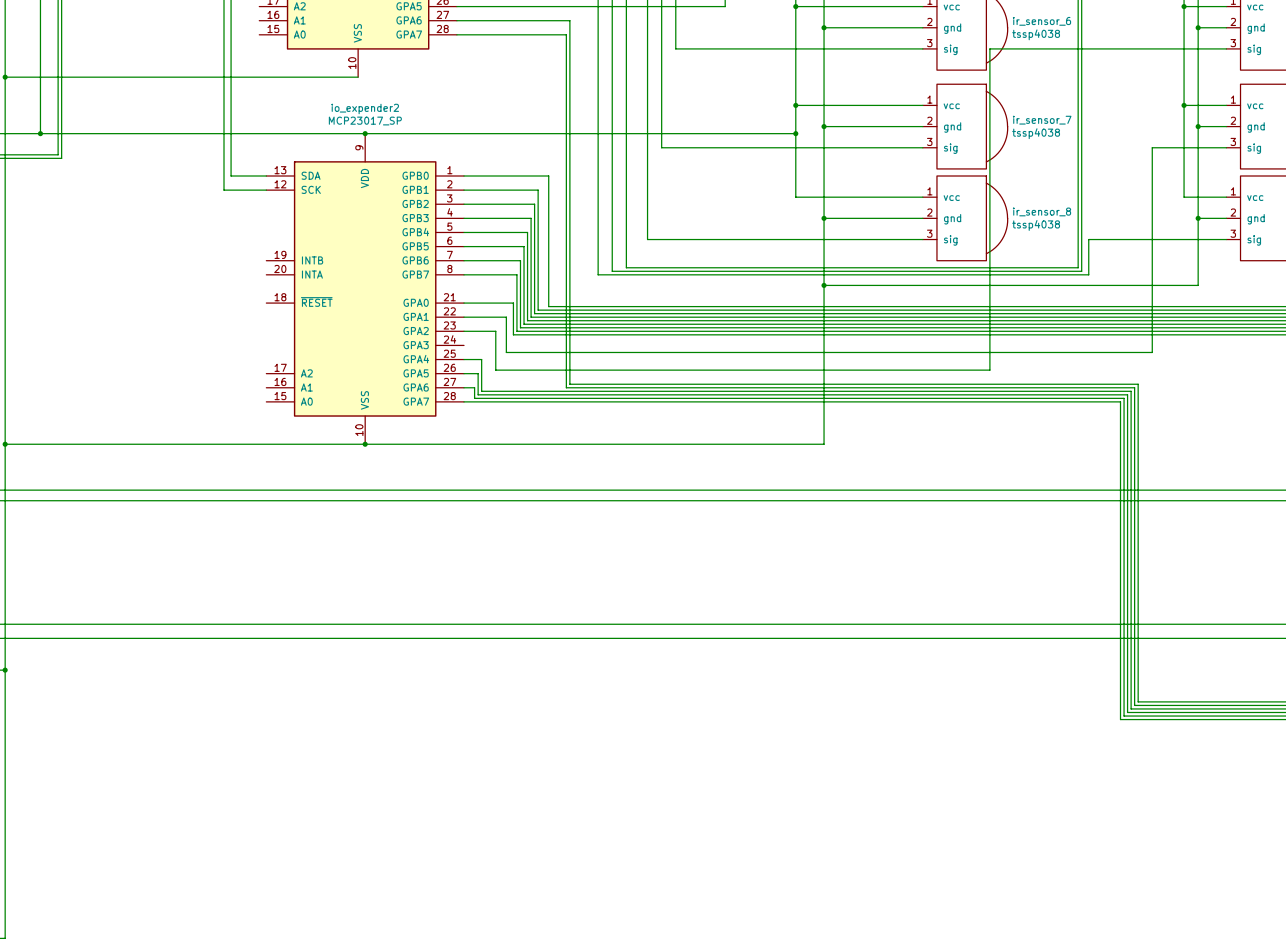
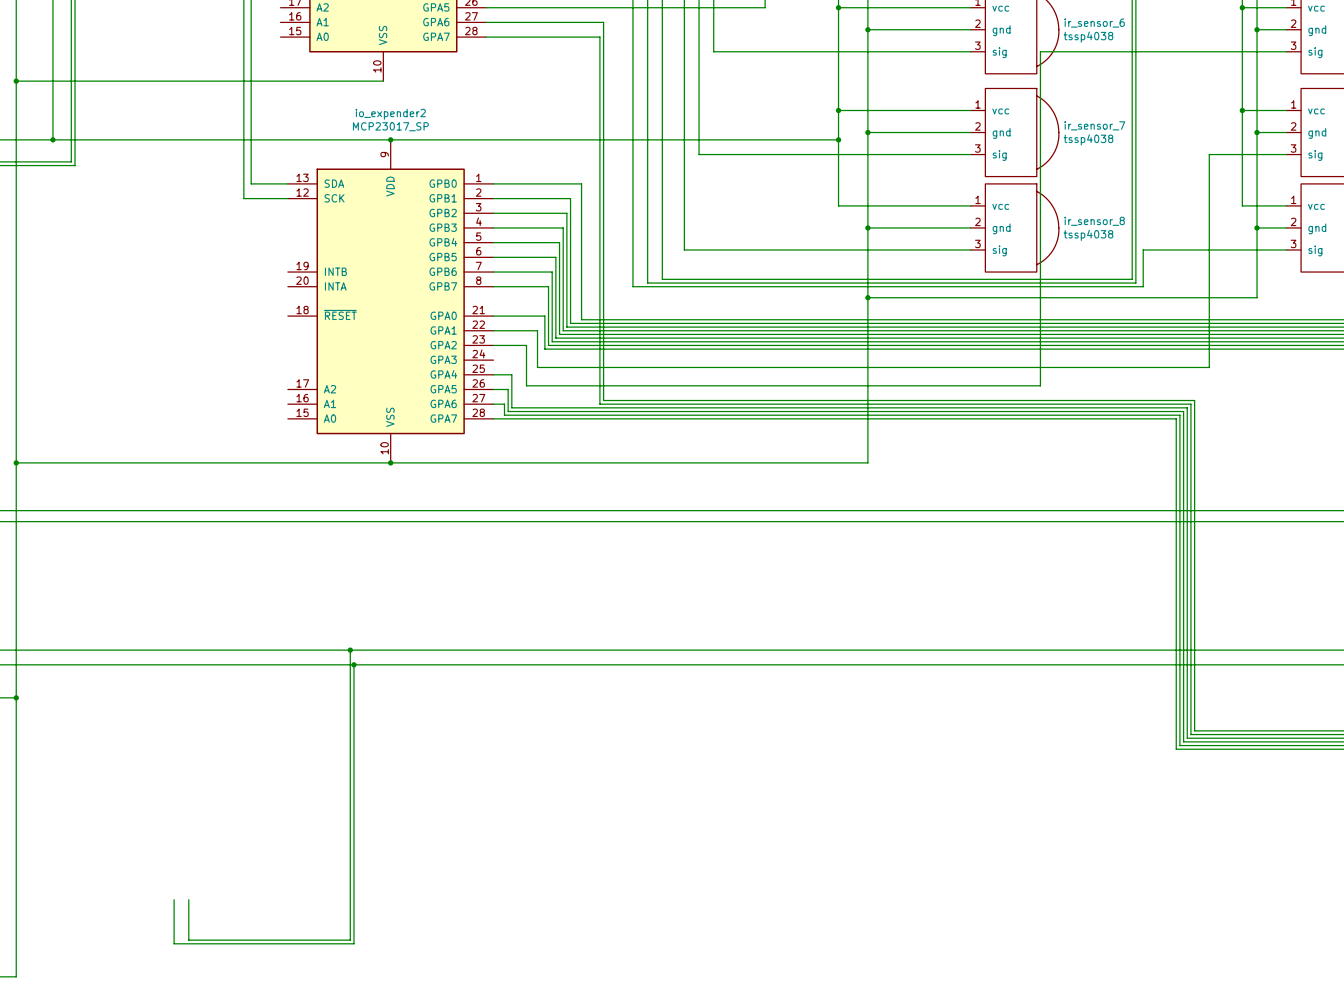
wire: none -> (350, 650) (350, 940) (188, 940) (188, 899)
junction: none -> (350, 650)
wire: none -> (353, 664) (353, 943) (174, 943) (174, 899)
junction: none -> (353, 664)

